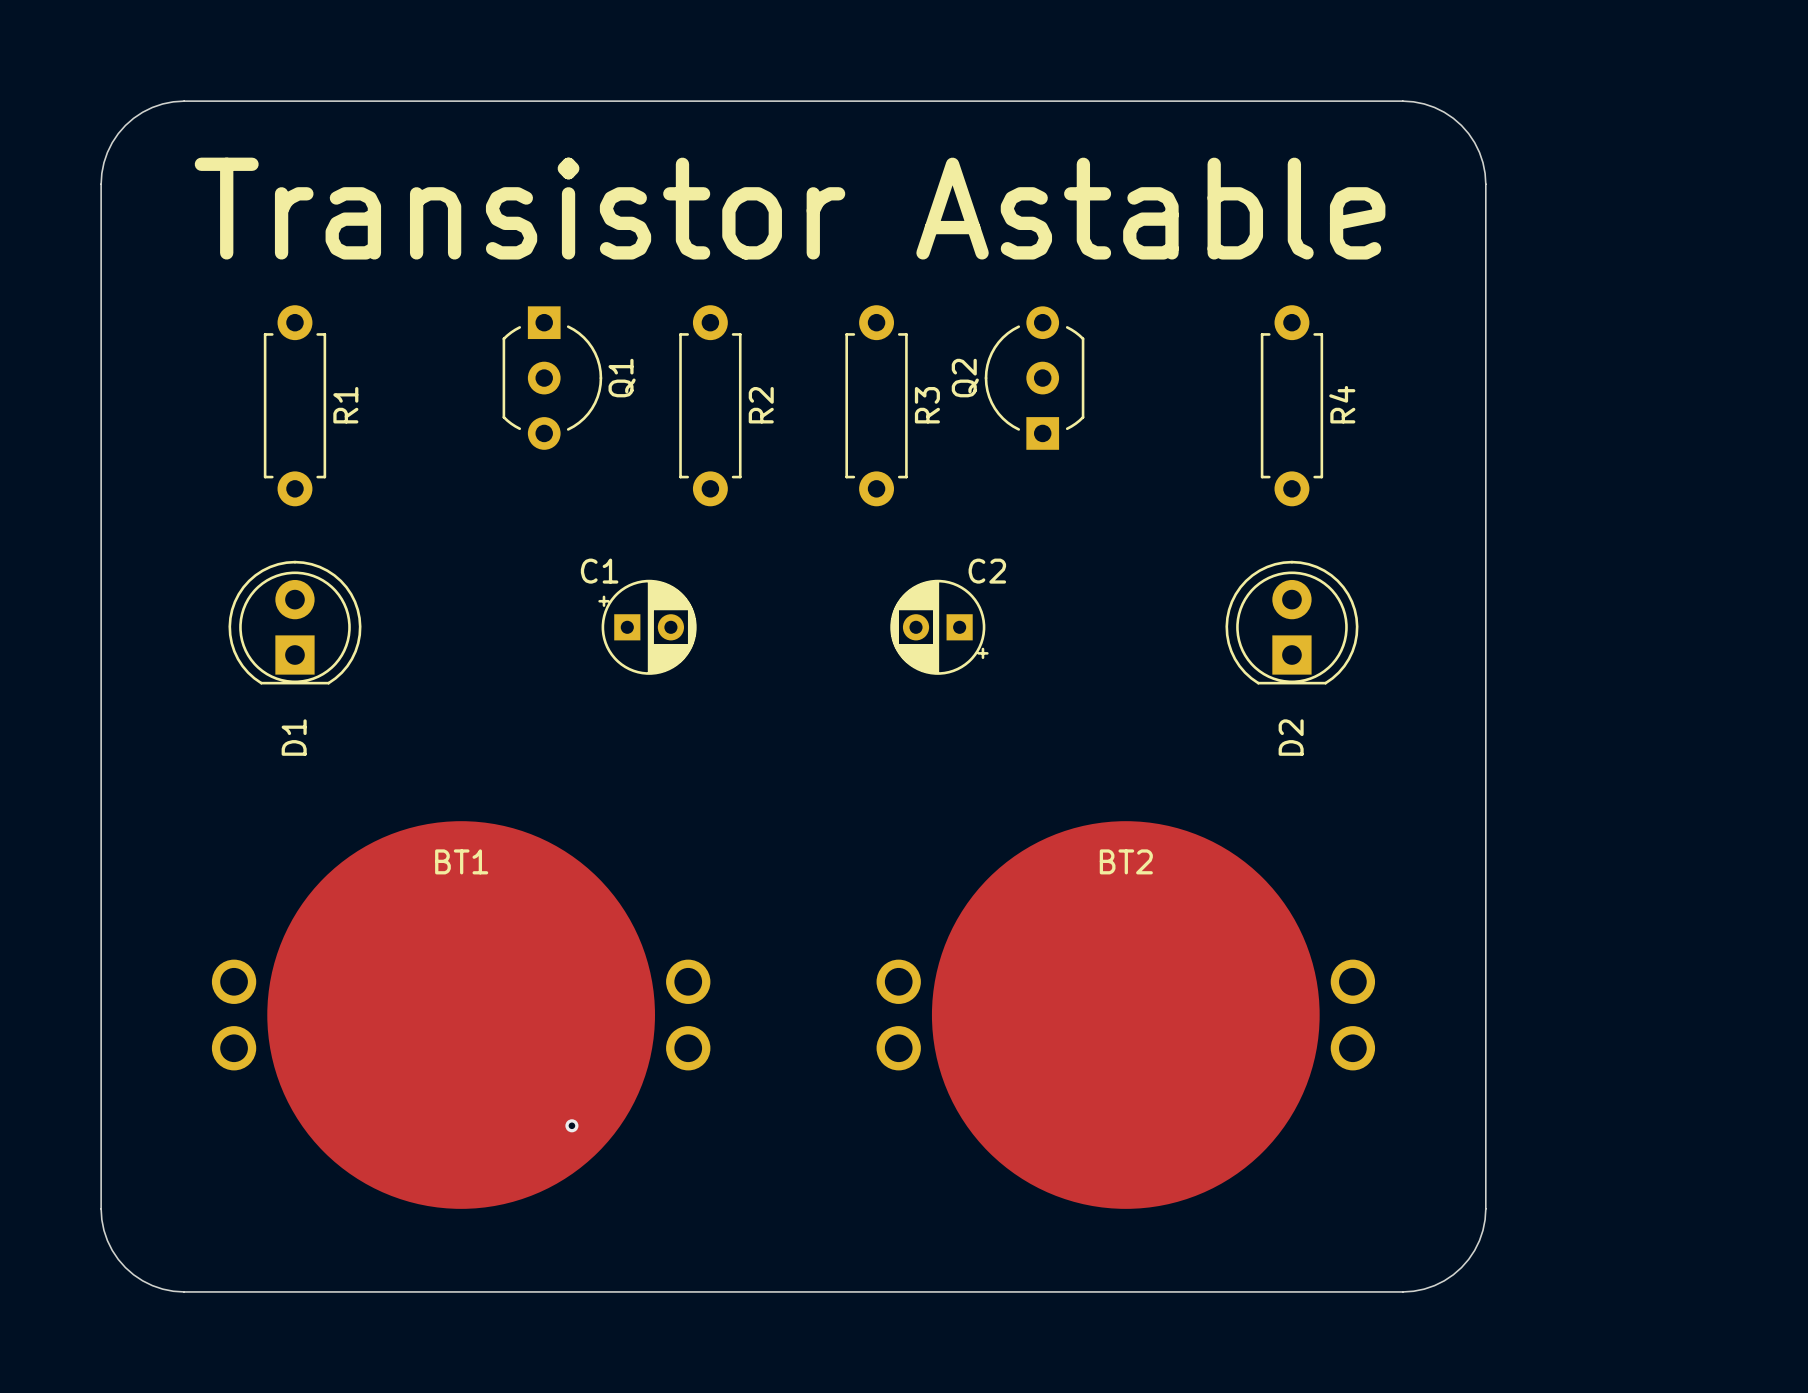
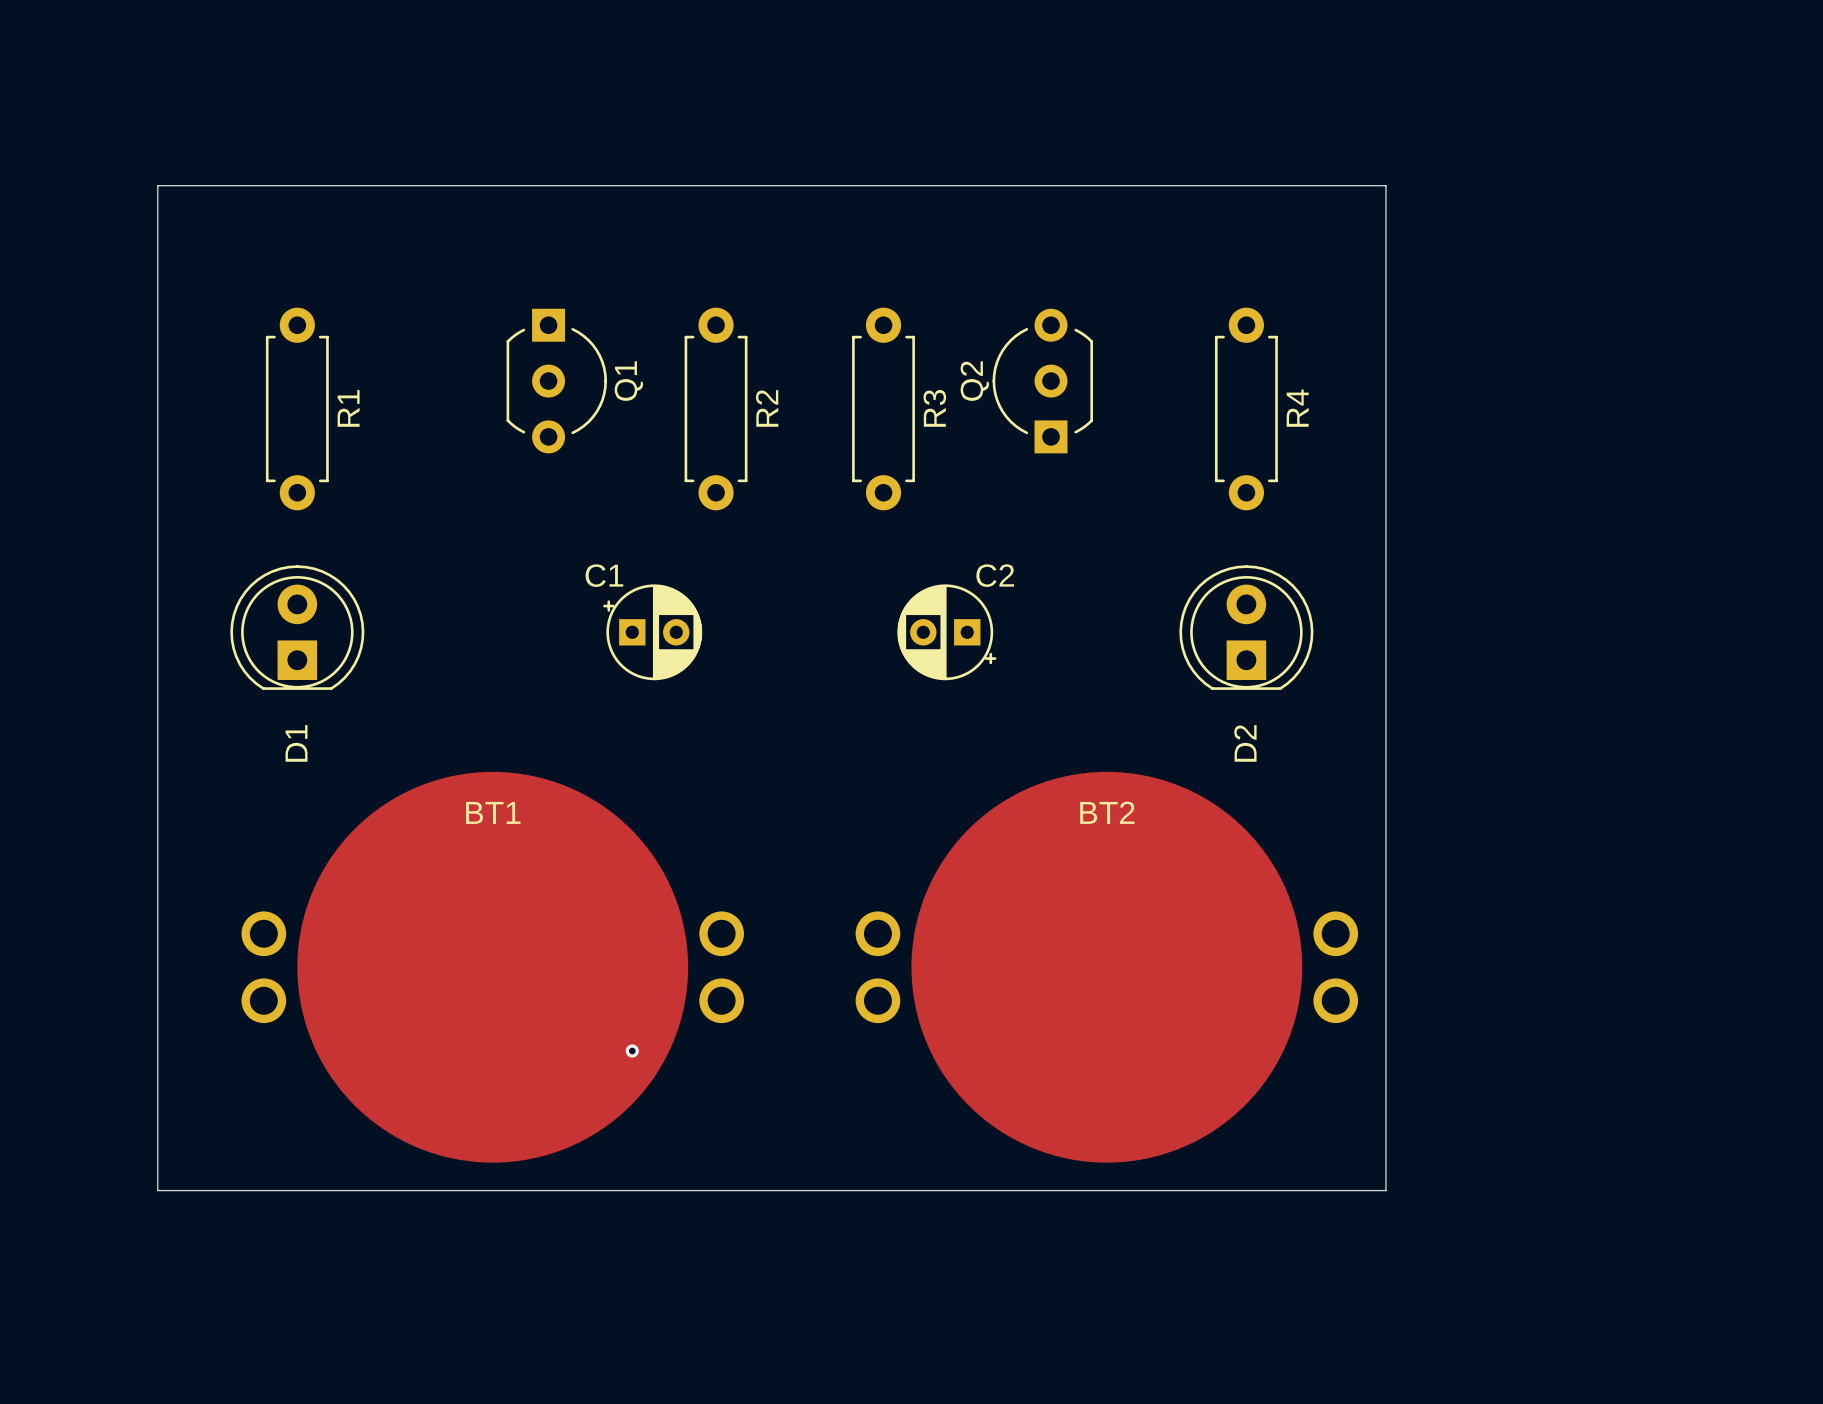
board edge: (184, 101) (1402, 101) (1434, 107) (1461, 125) (1479, 152) (1485, 184) (1485, 1208) (1479, 1240) (1461, 1267) (1434, 1285) (1402, 1291) (184, 1291) (152, 1285) (125, 1267) (107, 1240) (101, 1208) (101, 184) (107, 152) (125, 125) (152, 107) (184, 101) -> (157, 185) (157, 1190) (1385, 1190) (1385, 185) (157, 185)
text: Transistor Astable (790, 208) -> none
R4 position: (1291, 405) -> (1246, 408)
D2 position: (1291, 622) -> (1246, 627)
BT1 position: (461, 1015) -> (492, 967)
BT2 position: (1125, 1015) -> (1106, 967)
via position: (571, 1125) -> (632, 1051)

